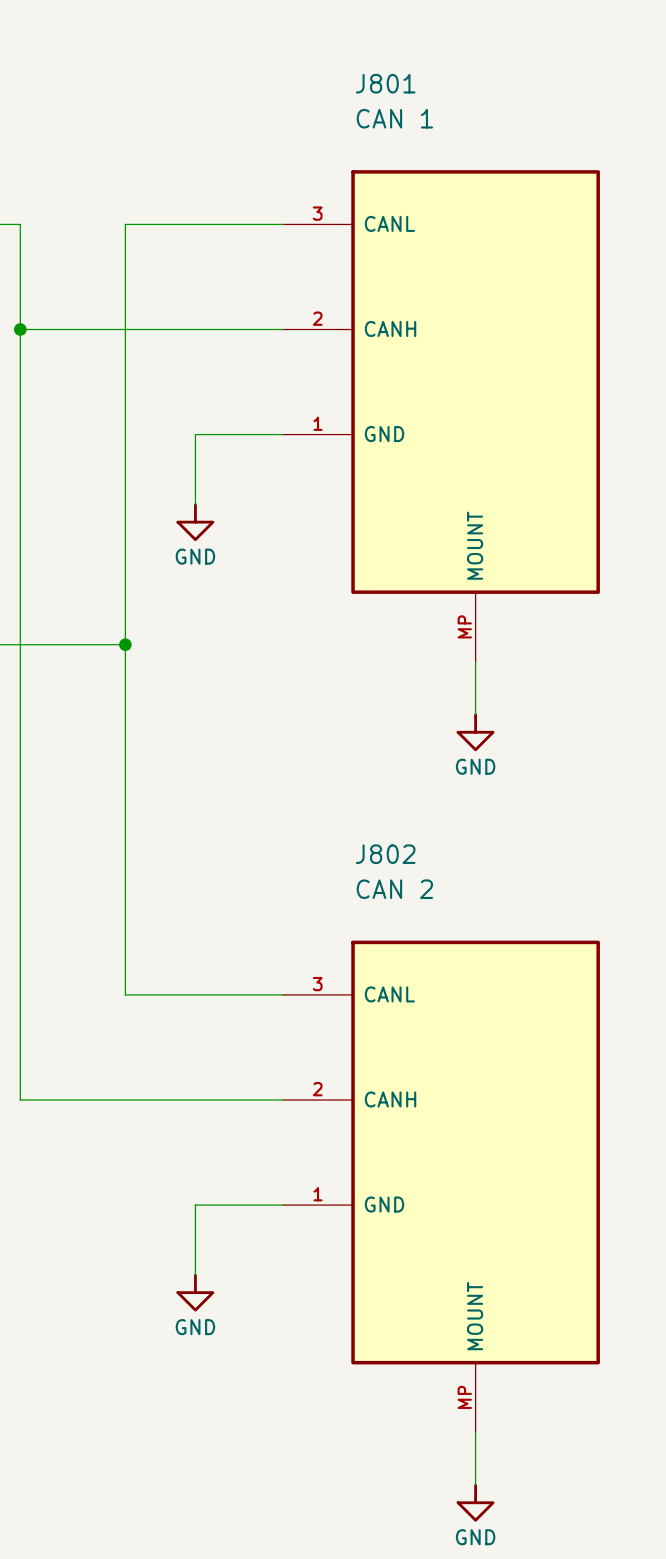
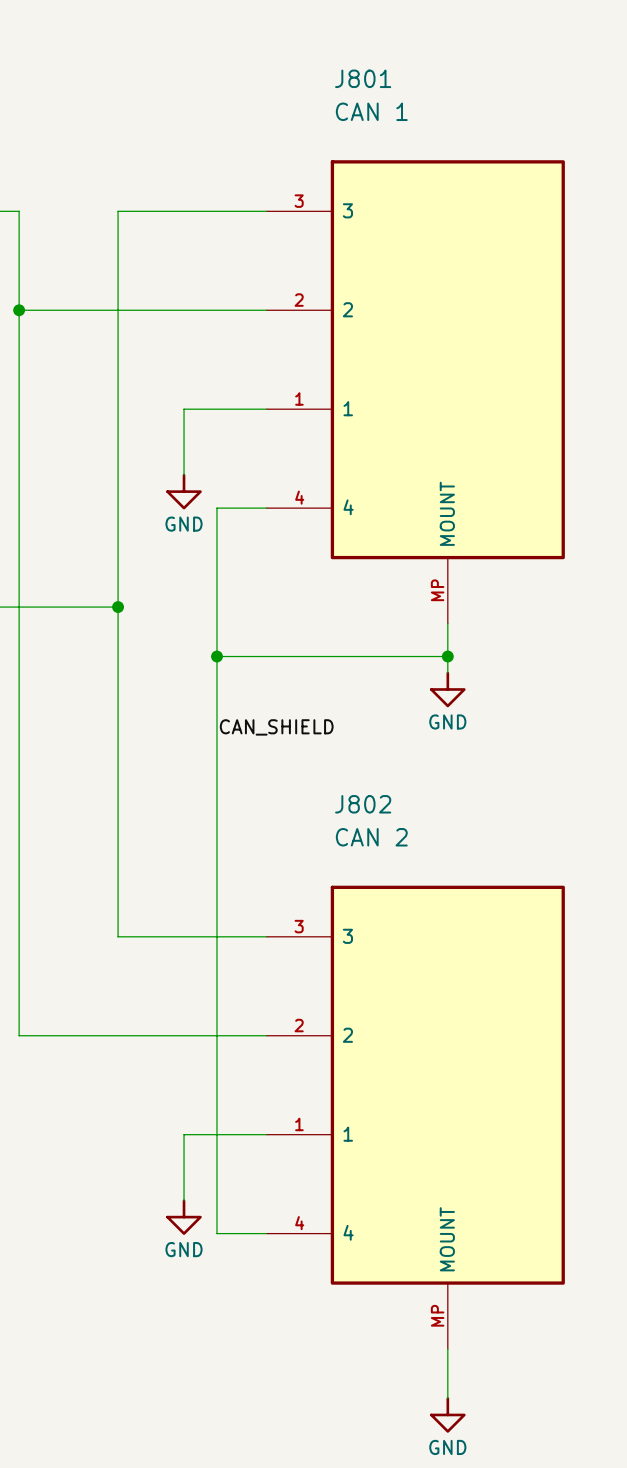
J801 symbol: [282, 170, 600, 663] -> [266, 160, 565, 624]
wire: none -> (266, 508) (216, 508) (216, 1233) (266, 1233)
wire: none -> (216, 656) (447, 656)
junction: none -> (216, 656)
junction: none -> (447, 656)
label: none -> CAN_SHIELD (276, 727)
J802 symbol: [282, 940, 600, 1433] -> [266, 885, 565, 1350]

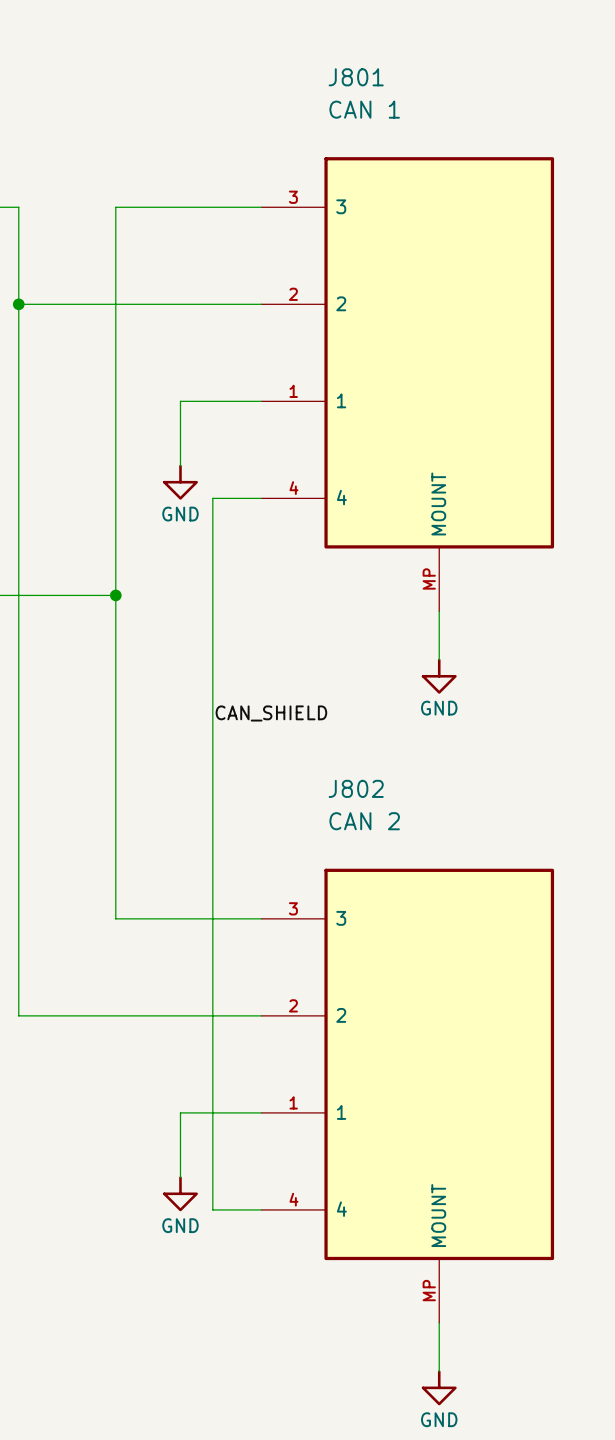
wire: (216, 656) (447, 656) -> none
junction: (216, 656) -> none
junction: (447, 656) -> none

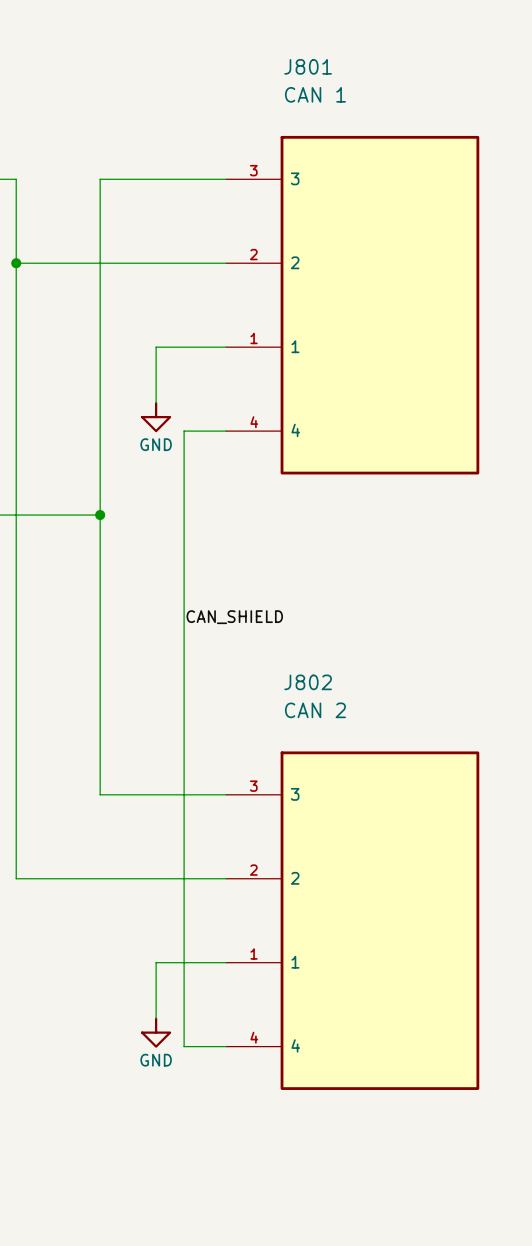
J801 symbol: [261, 157, 555, 612] -> [226, 135, 480, 475]
wire: (439, 611) (439, 660) -> none
power symbol: GND (439, 676) -> none
J802 symbol: [261, 868, 555, 1324] -> [226, 751, 480, 1090]
wire: (439, 1323) (439, 1371) -> none
power symbol: GND (439, 1387) -> none

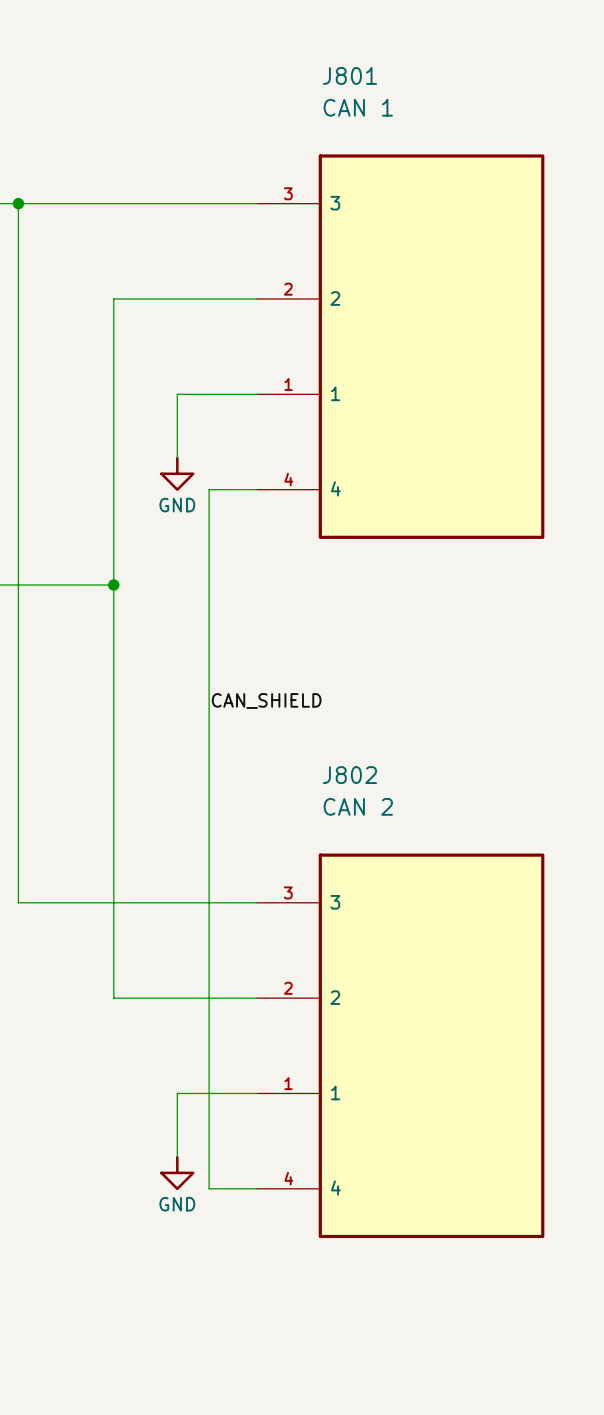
junction: none -> (18, 203)
wire: (100, 179) (100, 263) (16, 263) -> (113, 203) (18, 203)
junction: (16, 263) -> none
wire: (16, 794) (16, 878) (100, 878) -> (18, 902) (113, 902) (113, 998)

